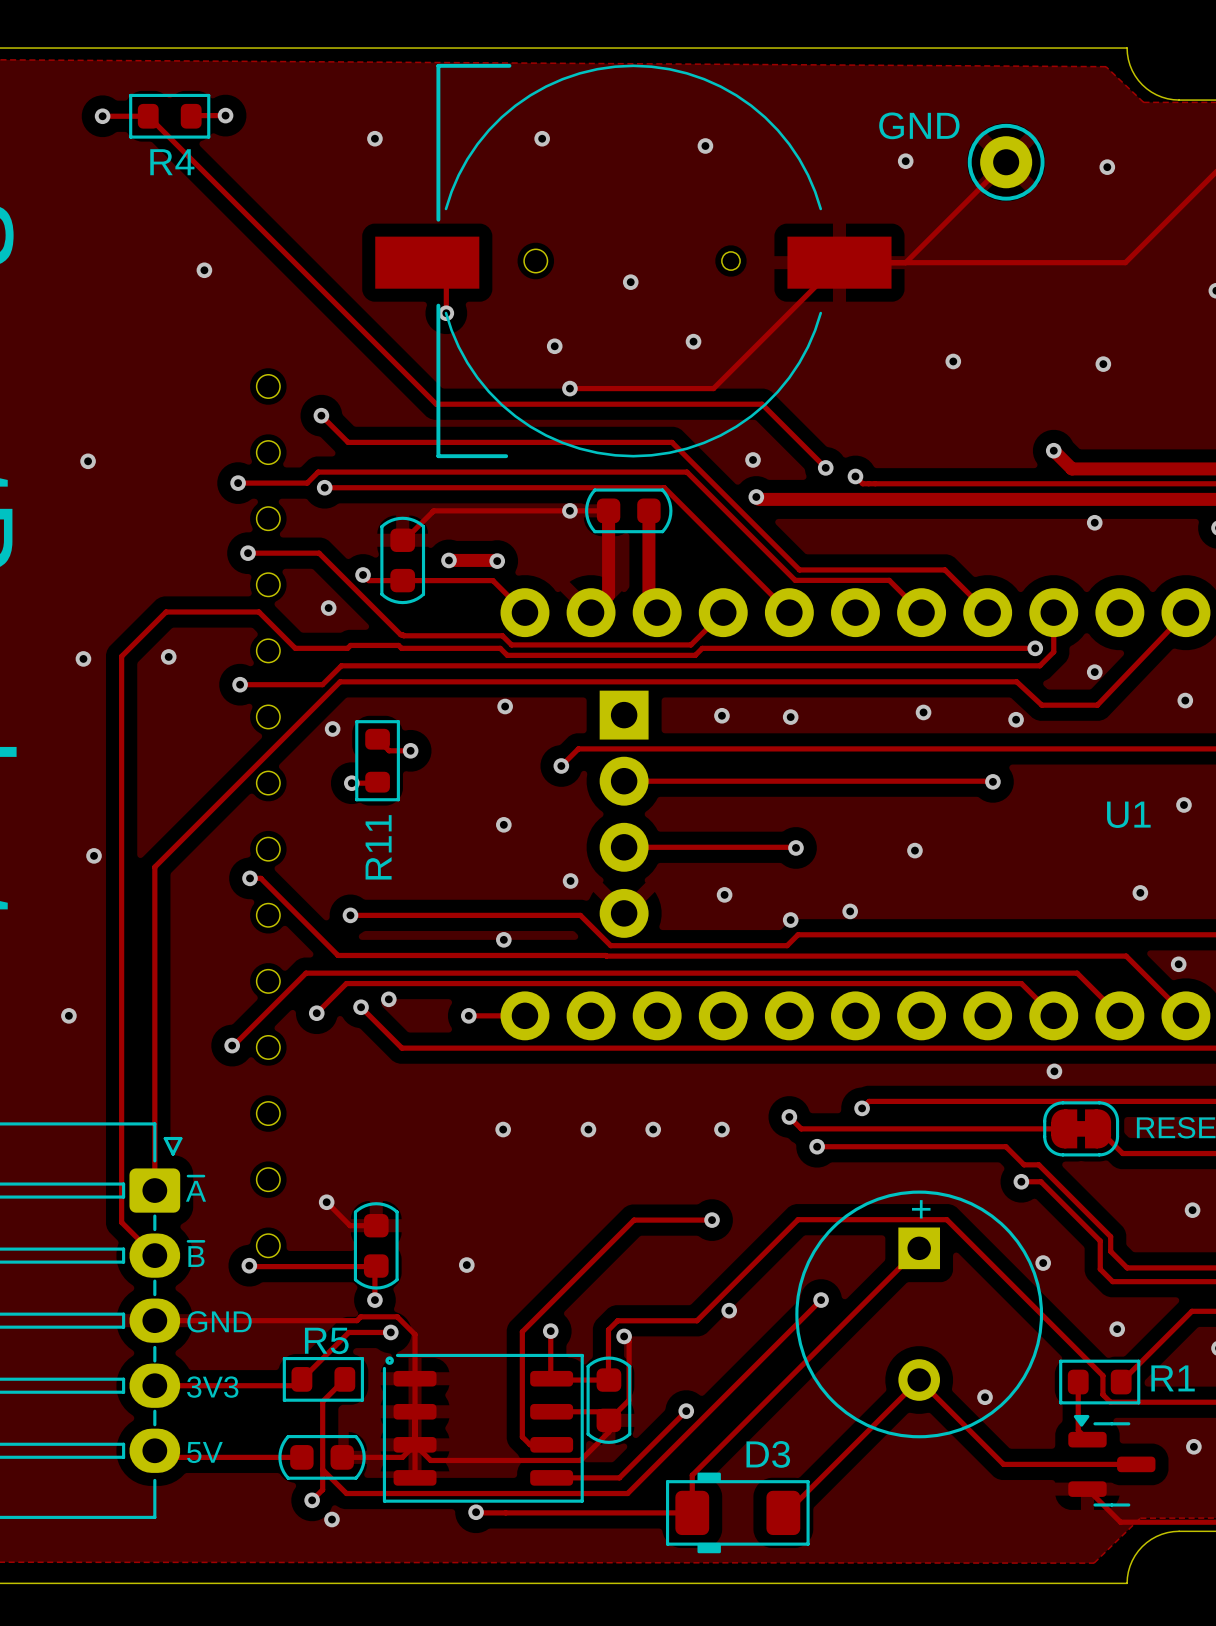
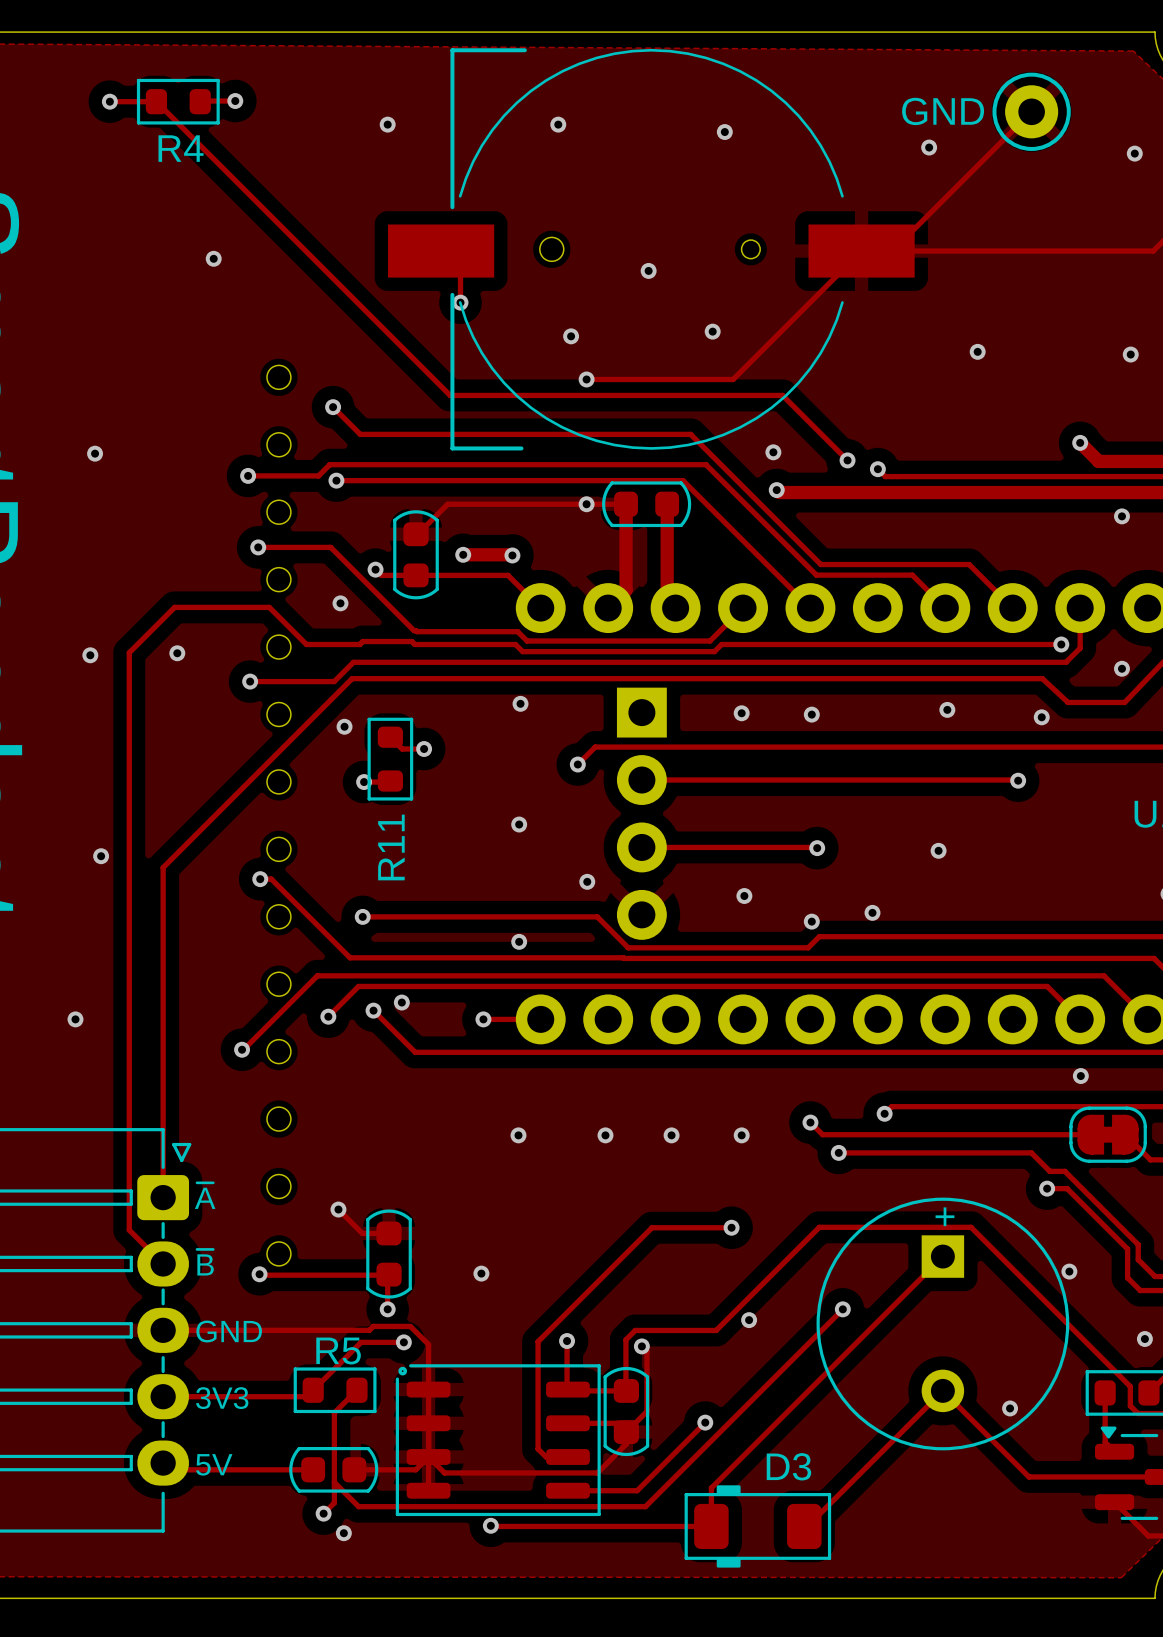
track: none -> (1031, 111) (892, 251)
track: (1006, 162) (905, 262) -> none
part position: (1006, 162) -> (1031, 111)

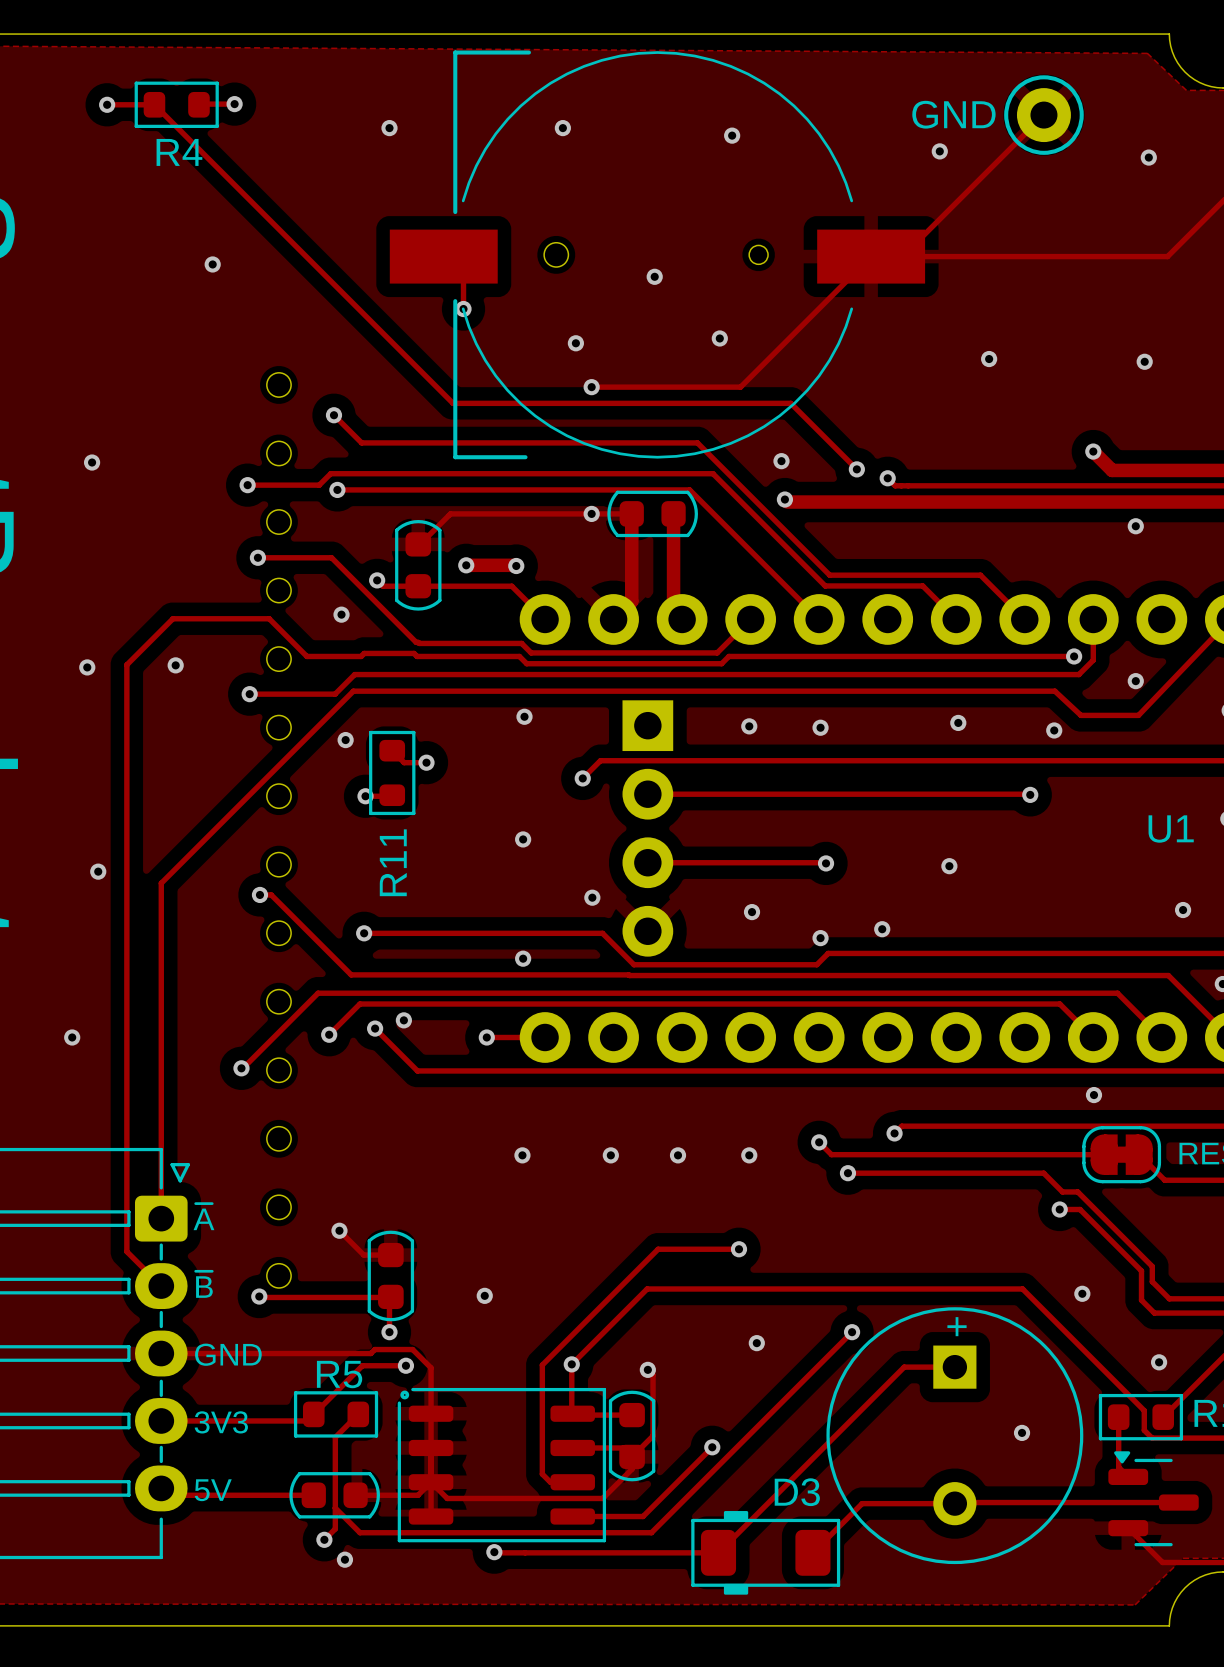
track: (942, 1256) (711, 1488) (711, 1526) -> (954, 1367) (904, 1367) (718, 1552)
track: (1010, 1266) (971, 1227) (819, 1227) (716, 1330) (635, 1330) (625, 1339) (626, 1390) -> (1022, 1289) (647, 1289) (571, 1364)
part position: (942, 1323) -> (954, 1435)
track: (1028, 1476) (942, 1390) (807, 1526) (804, 1526) -> (1041, 1502) (862, 1503) (812, 1552)

